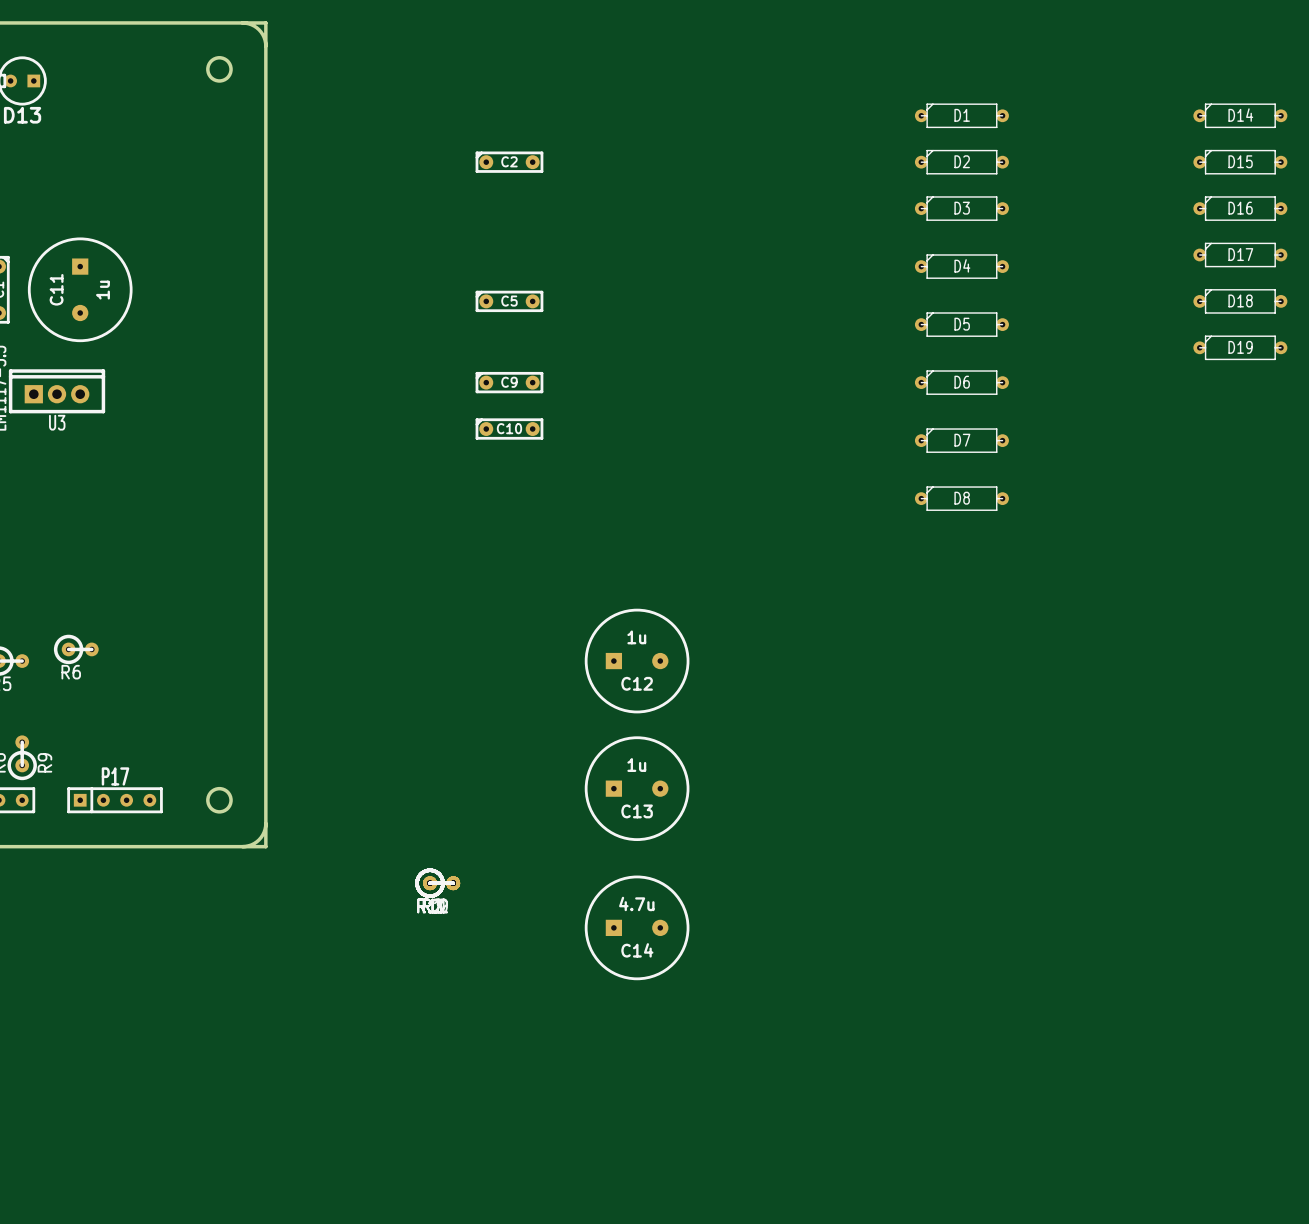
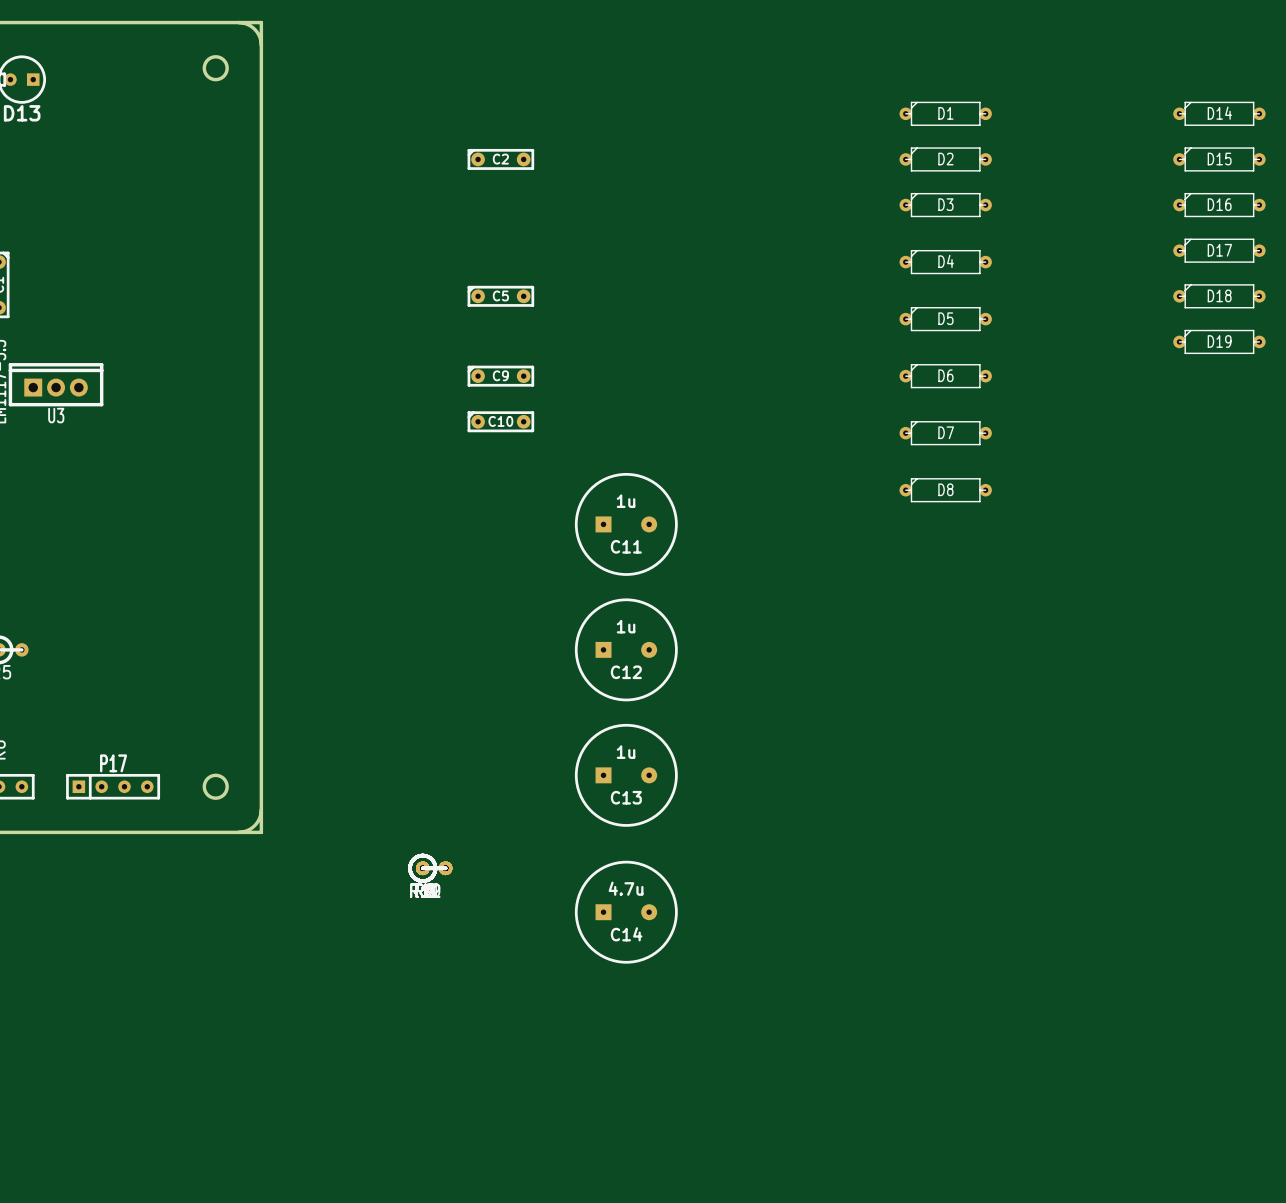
C11 rotation: 0° (80, 289) -> 90° counterclockwise (626, 524)
C11 position: (80, 289) -> (626, 524)
R6 position: (76, 649) -> (430, 868)
R9 rotation: 0° (22, 757) -> 90° clockwise (430, 868)
R9 position: (22, 757) -> (430, 868)

